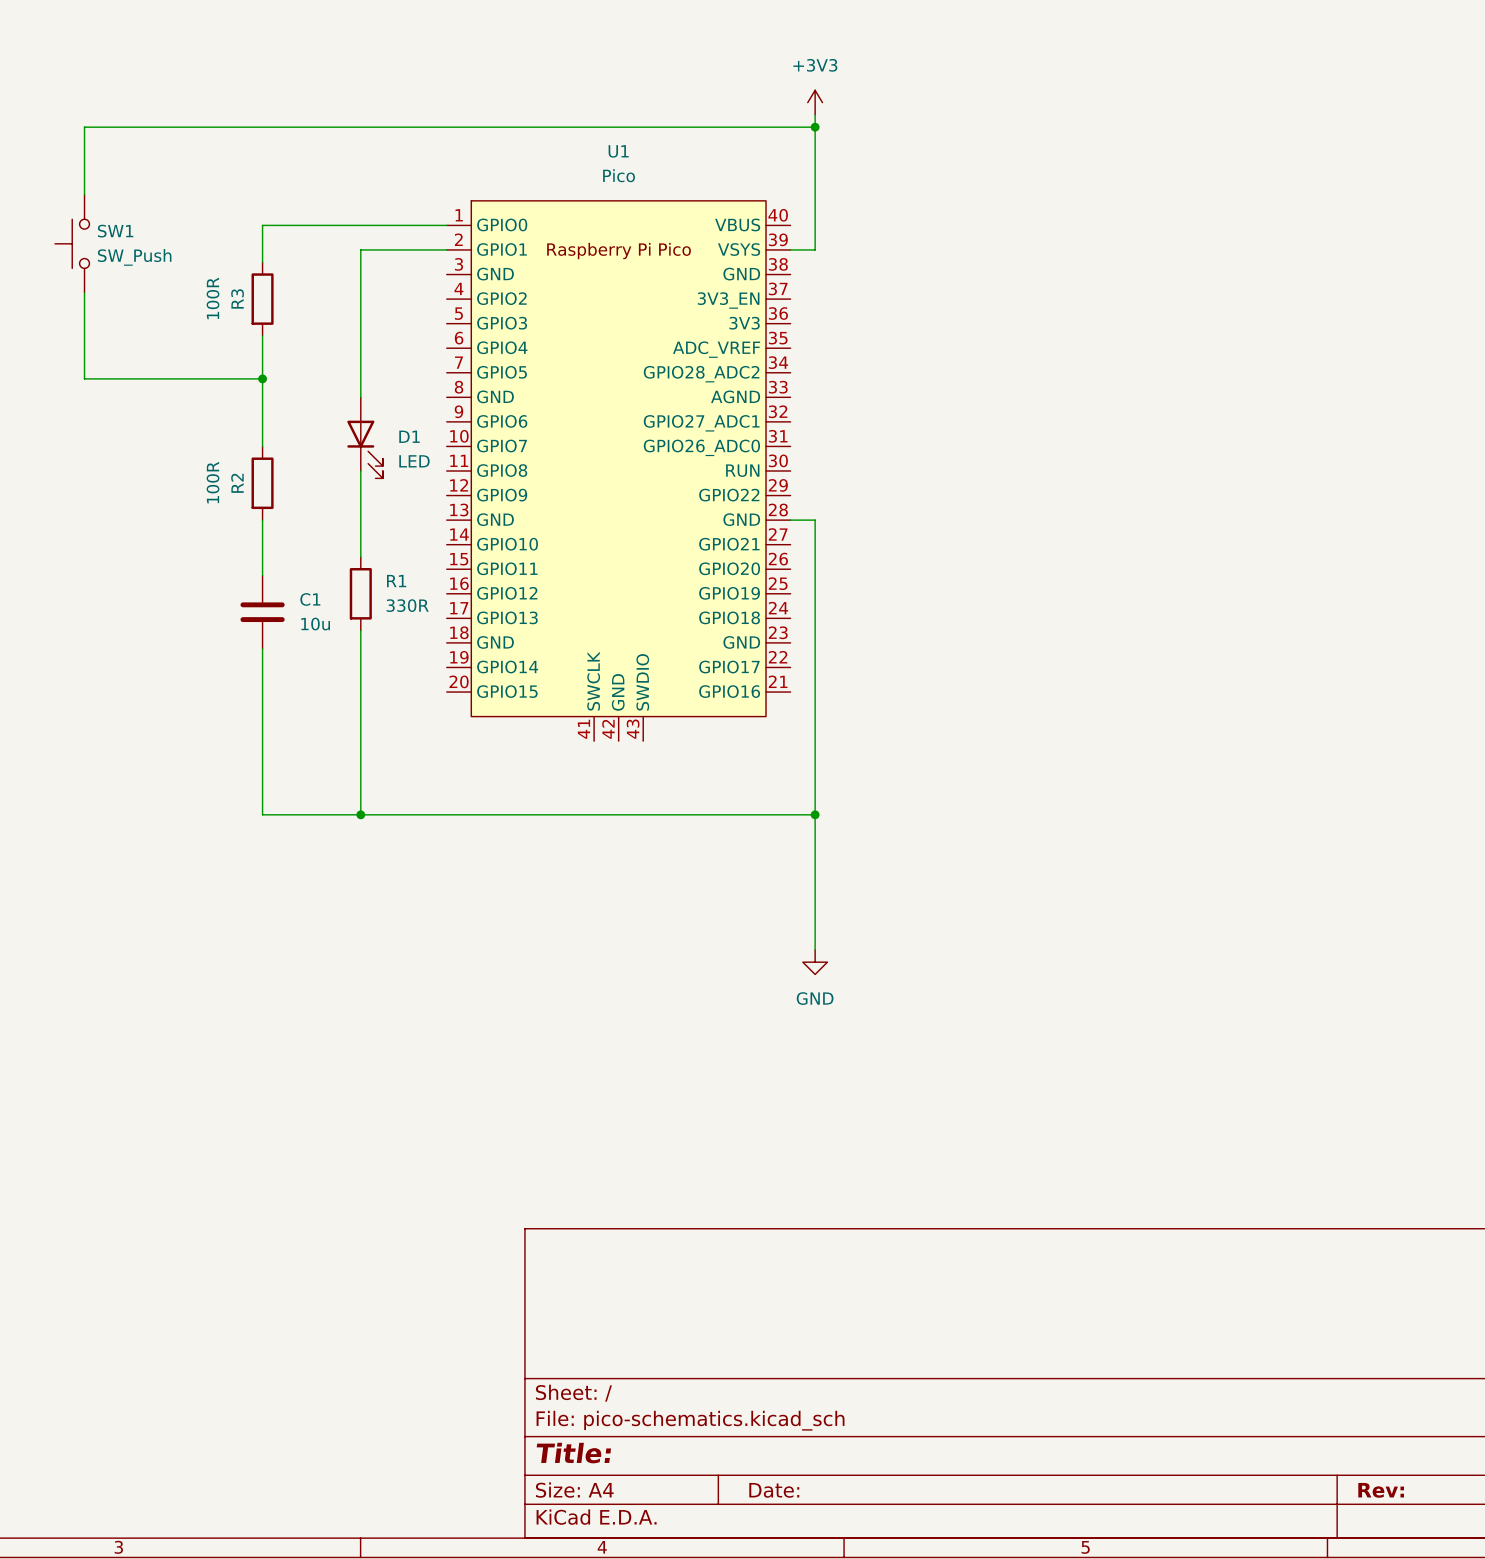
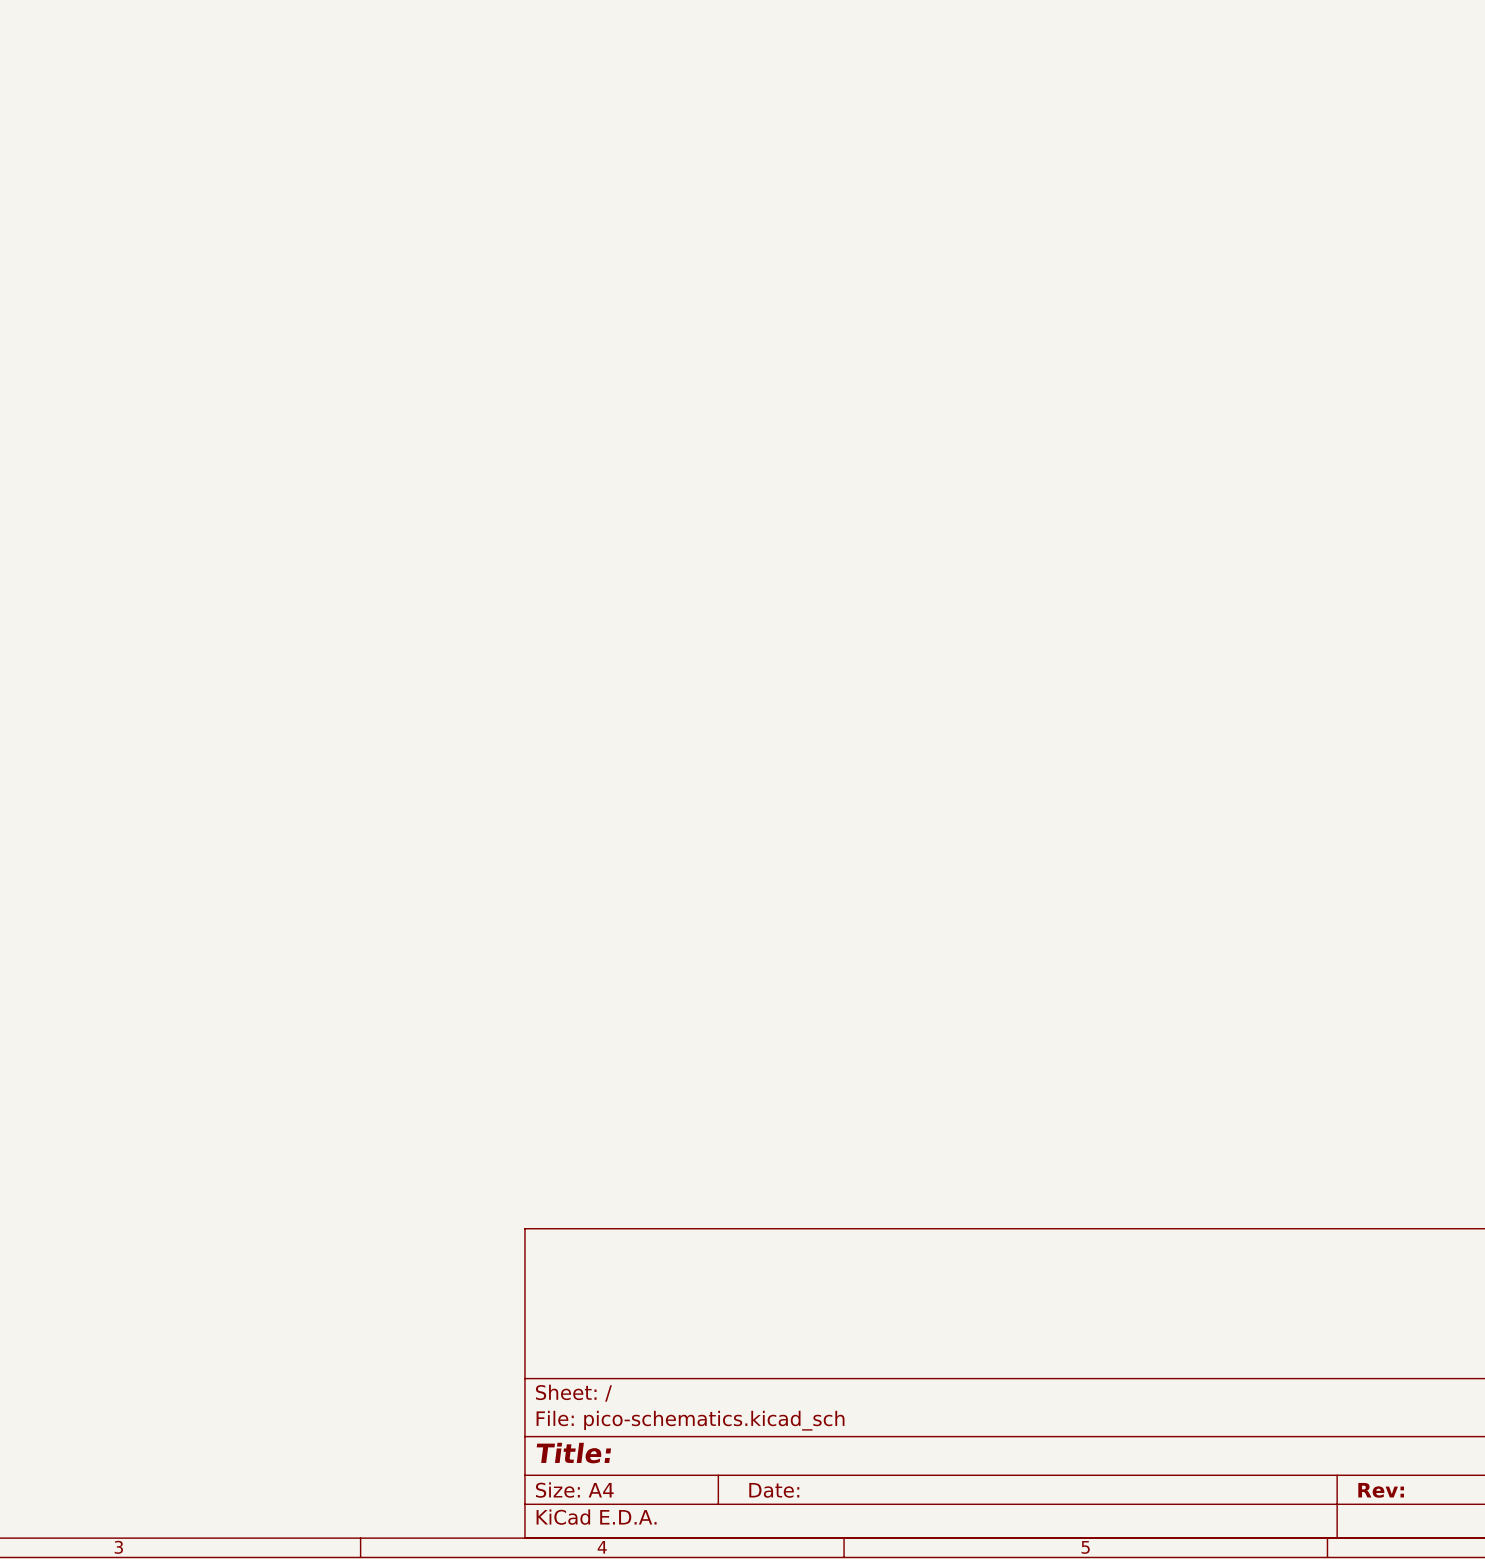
power symbol: +3V3 (815, 102) -> none
wire: (815, 114) (815, 249) (790, 249) -> none
wire: (815, 127) (84, 127) (84, 194) -> none
junction: (815, 127) -> none
wire: (446, 225) (262, 225) (262, 262) -> none
SW1: SW_Push (72, 243) -> none
wire: (446, 249) (360, 249) (360, 397) -> none
wire: (84, 292) (84, 378) (262, 378) -> none
R3: 100R (262, 299) -> none
wire: (262, 335) (262, 446) -> none
junction: (262, 378) -> none
D1: LED (365, 437) -> none
wire: (360, 471) (360, 556) -> none
U1: Pico (618, 471) -> none
R2: 100R (262, 483) -> none
wire: (262, 520) (262, 575) -> none
wire: (790, 520) (815, 520) (815, 949) -> none
R1: 330R (360, 593) -> none
C1: 10u (262, 612) -> none
wire: (360, 630) (360, 814) -> none
wire: (262, 649) (262, 814) (815, 814) -> none
junction: (360, 814) -> none
junction: (815, 814) -> none
power symbol: GND (815, 962) -> none

